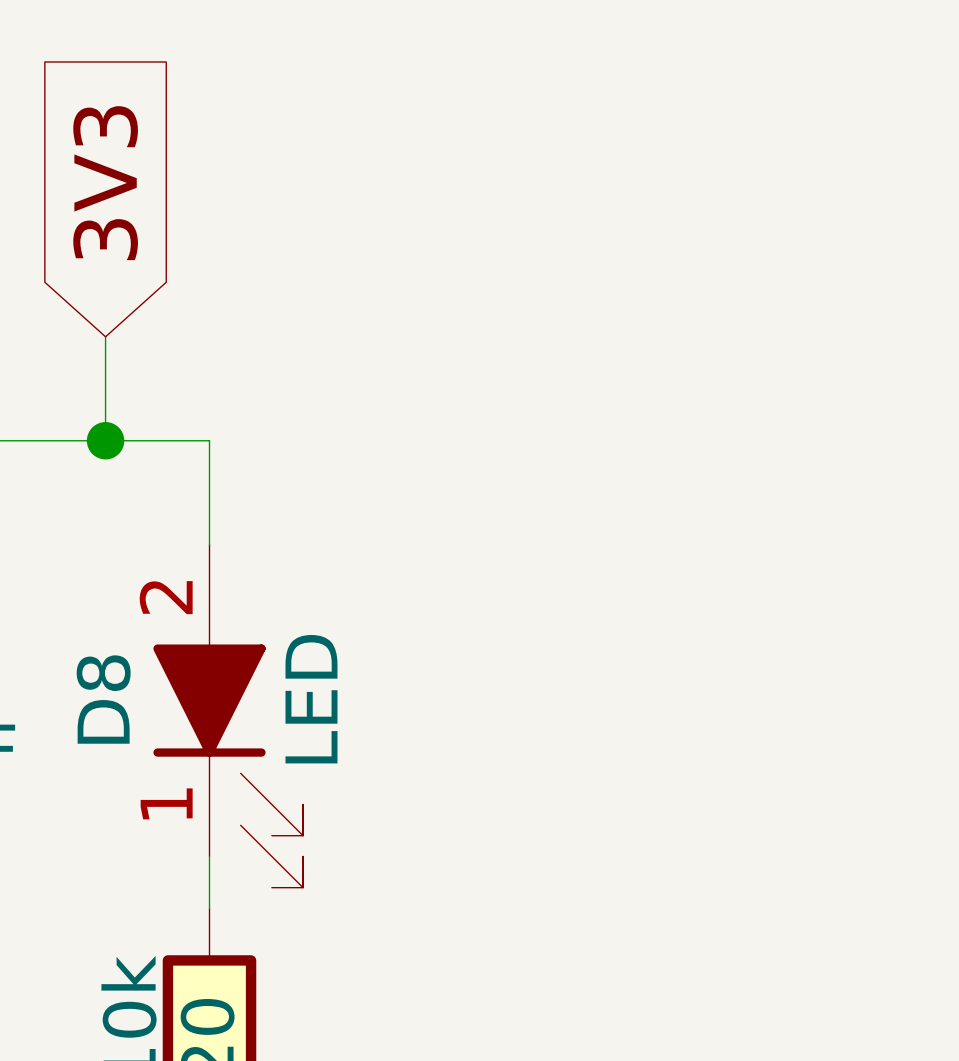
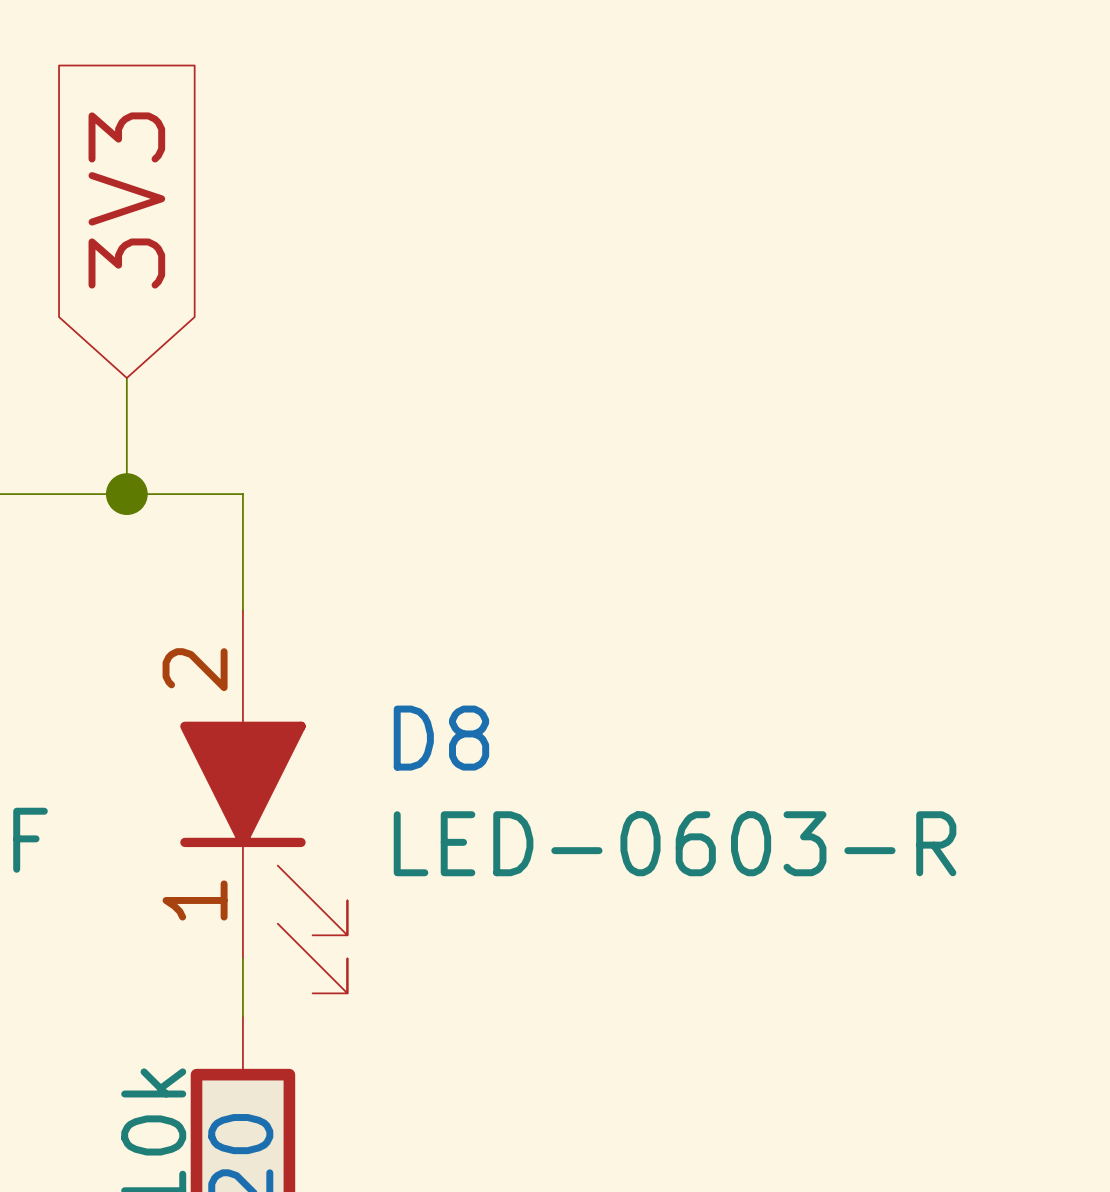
D8 name rotation: 0° (103, 699) -> 90° clockwise (441, 738)
D8 name position: D8 (103, 699) -> D8 (441, 738)
D8 value: LED (311, 699) -> LED-0603-R (675, 843)

